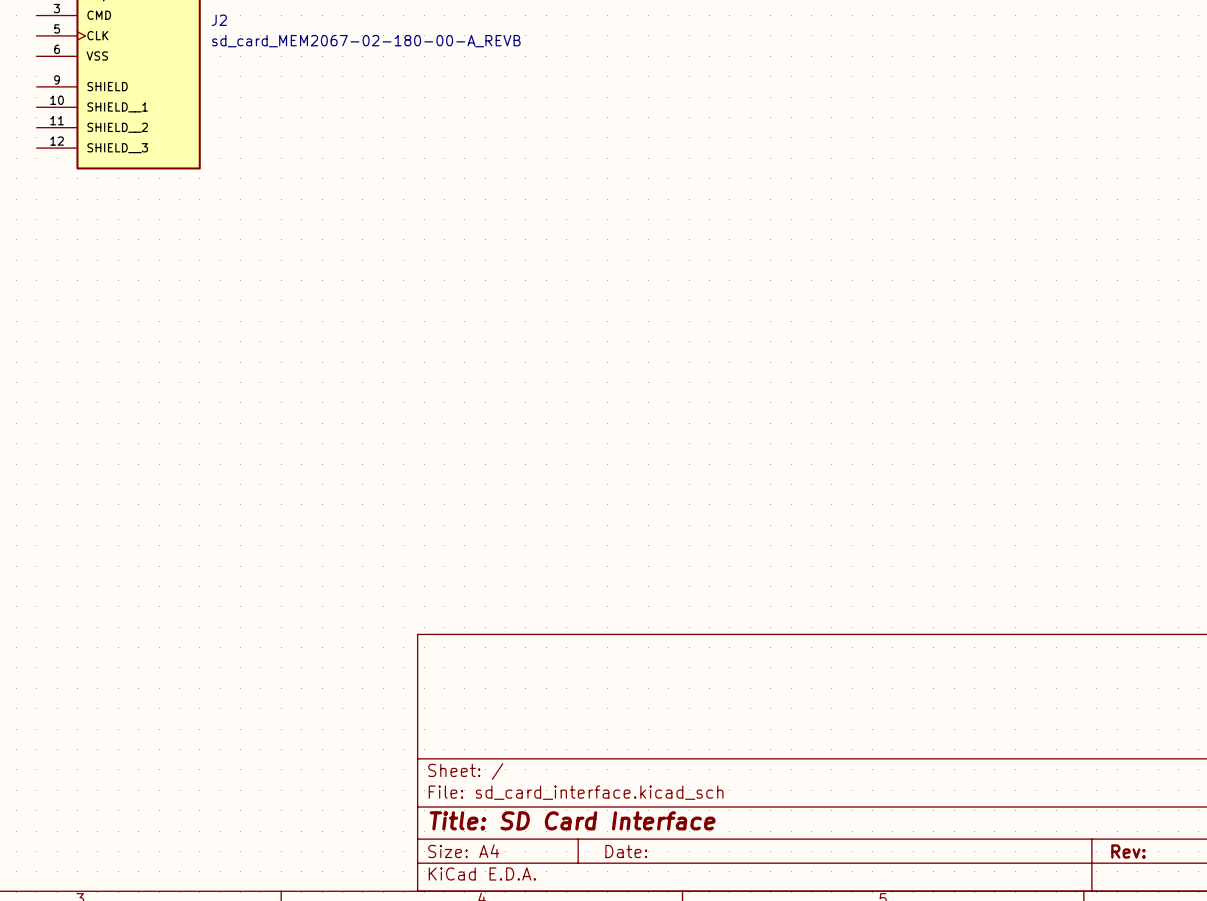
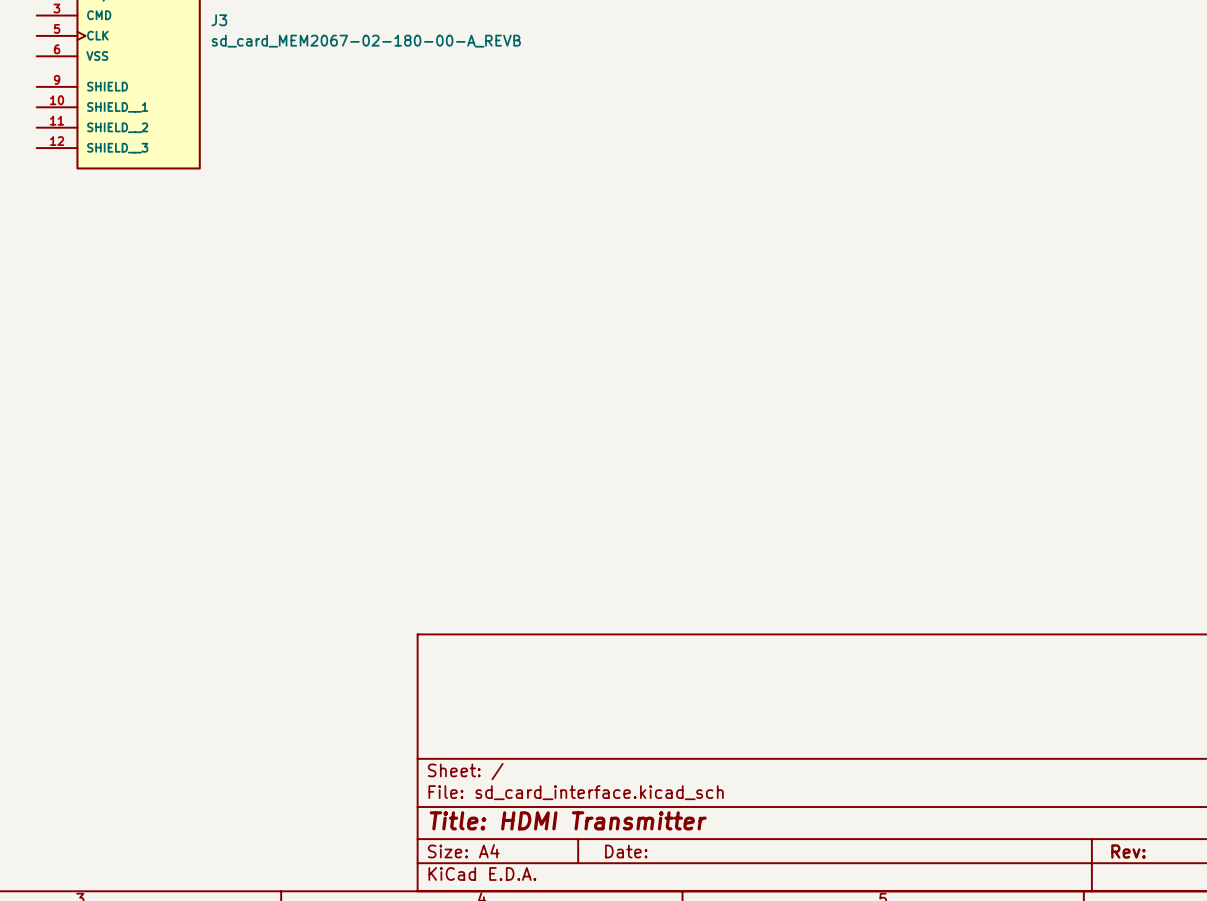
J2 name: J2 (219, 20) -> J3 (219, 20)
title block: Title: SD Card Interface (572, 820) -> Title: HDMI Transmitter (568, 820)

